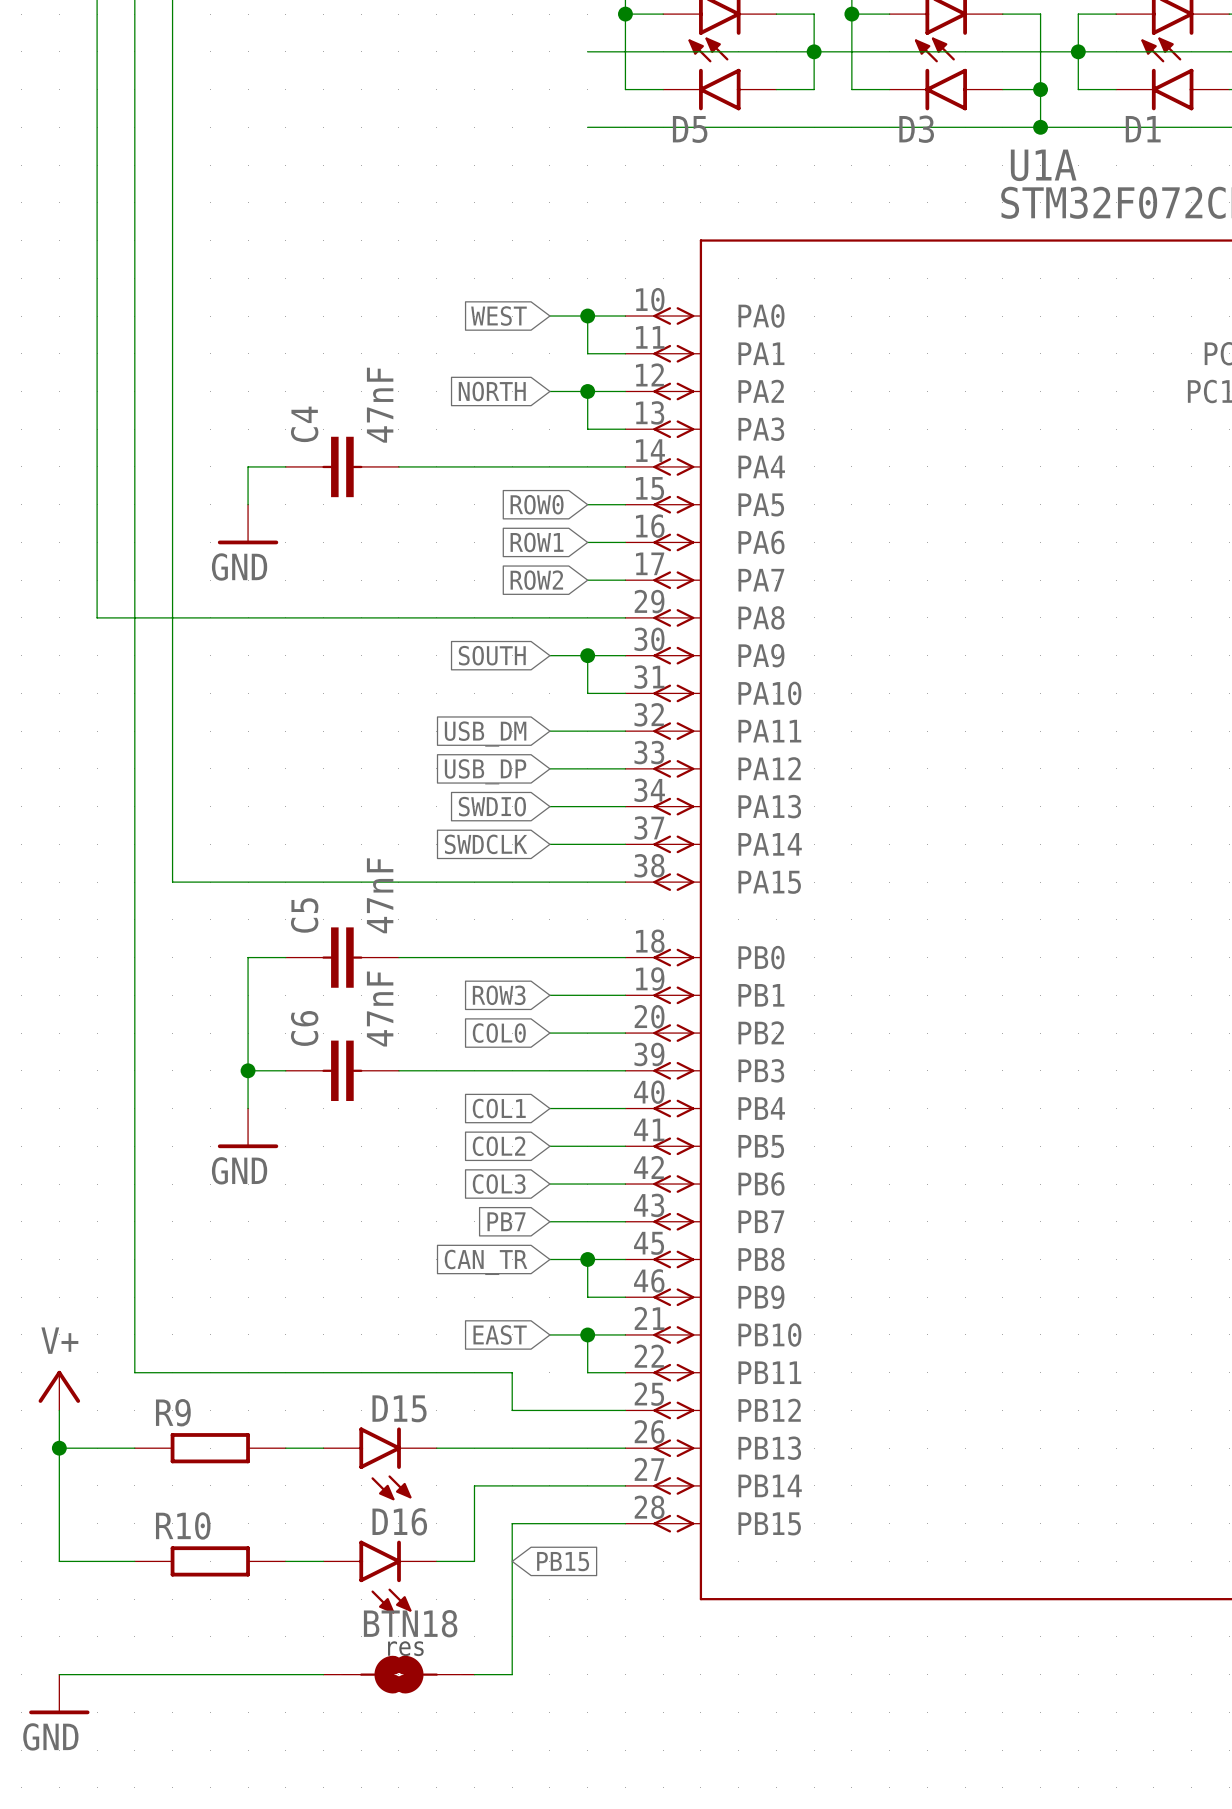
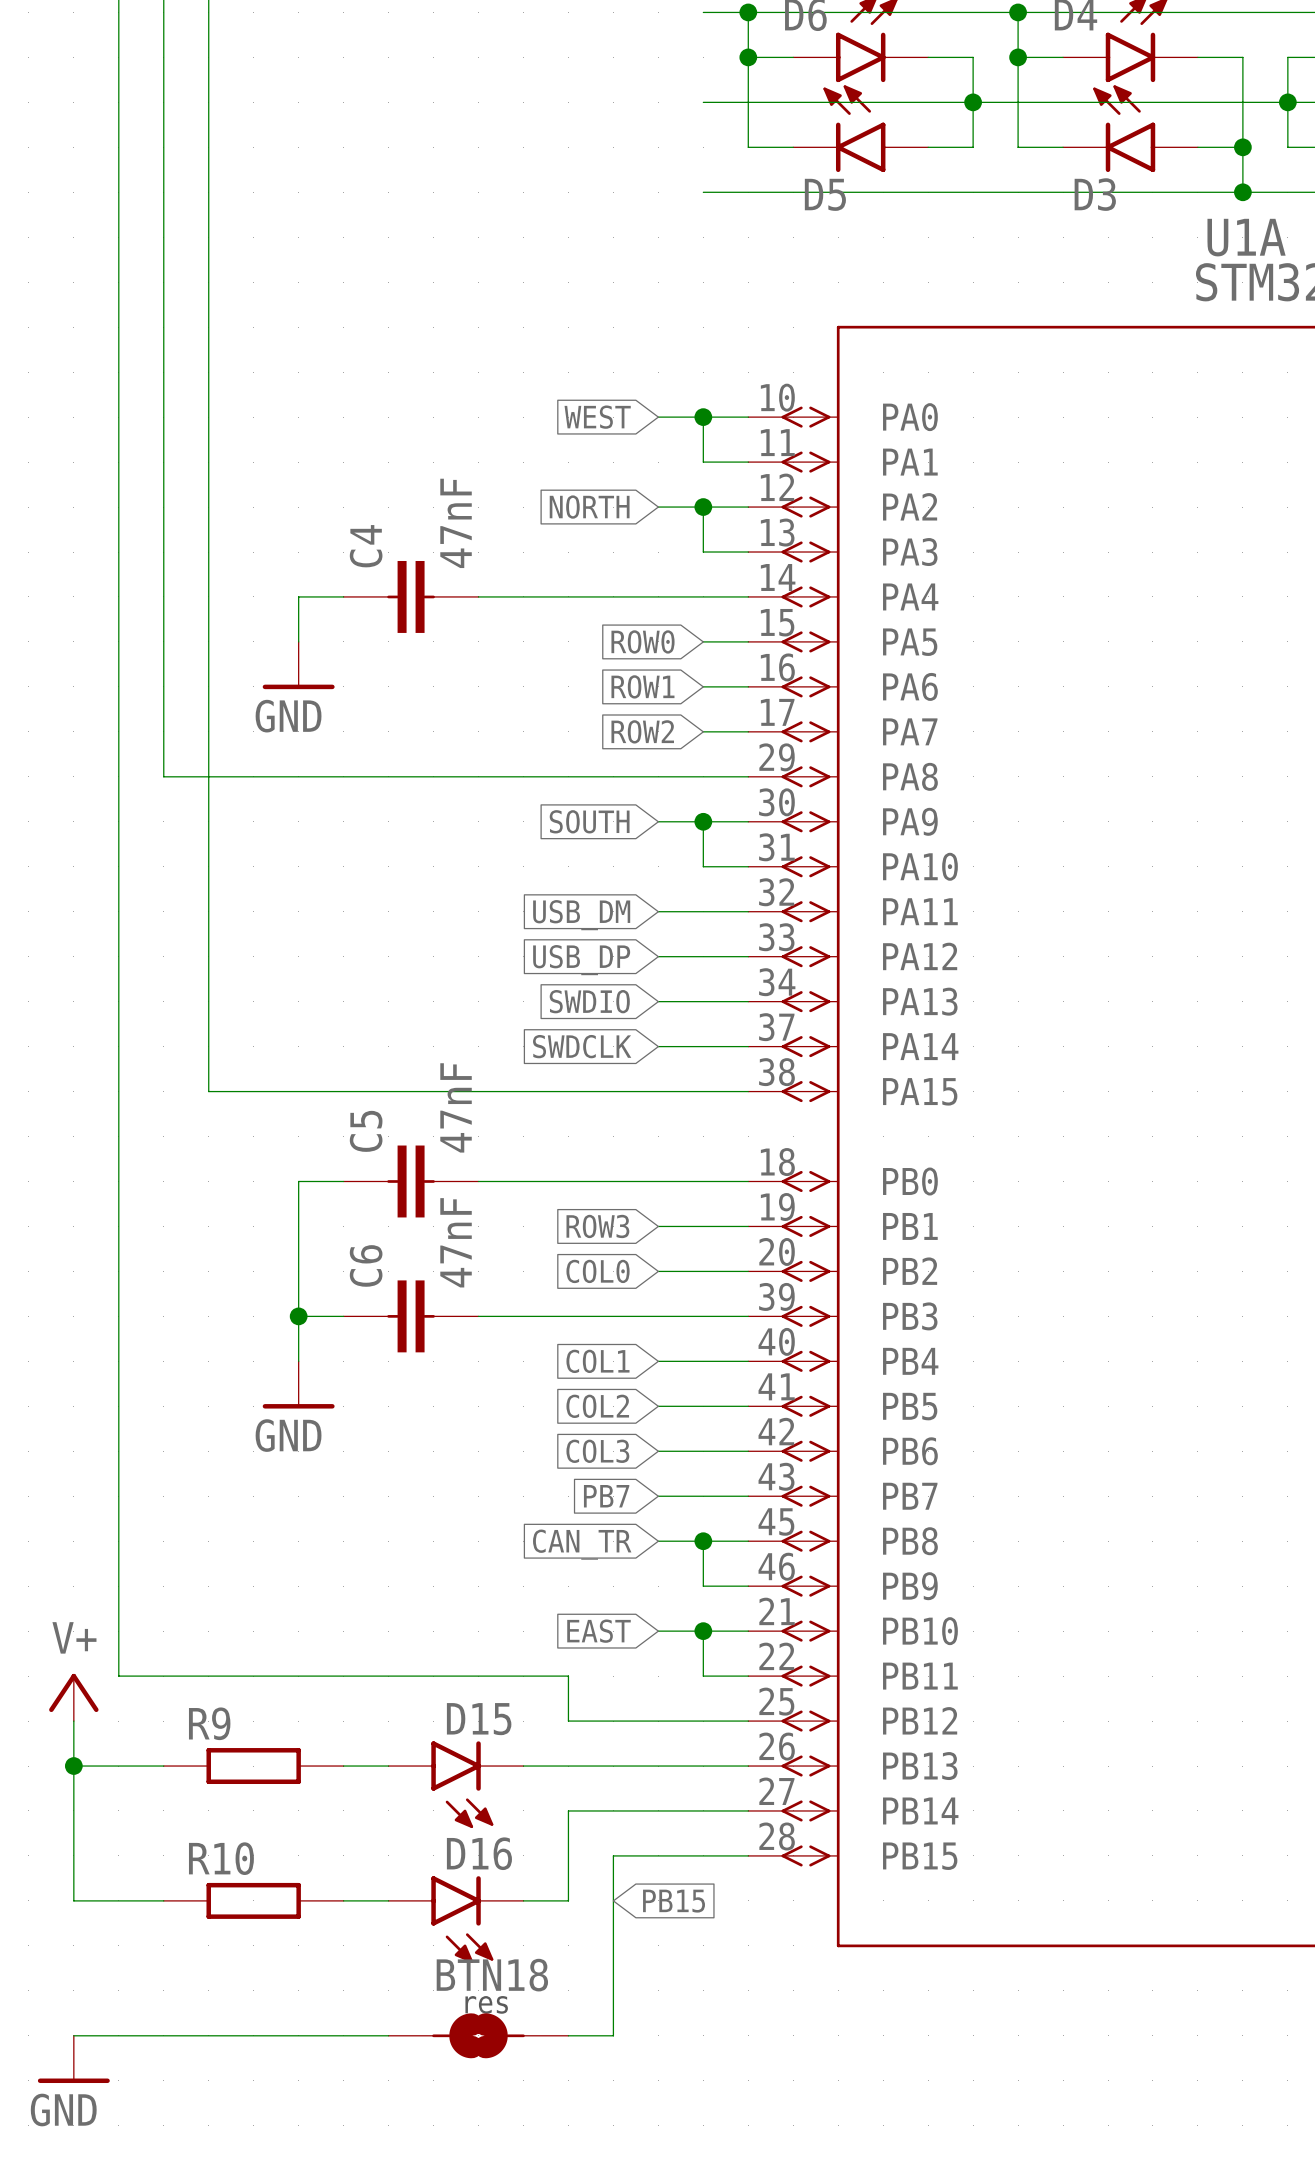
wire: (97, 617) (134, 617) (134, 1372) -> (118, 776) (118, 1676) (163, 1676)
wire: (474, 1372) (512, 1372) (512, 1410) -> (568, 1676) (568, 1721) (613, 1721)

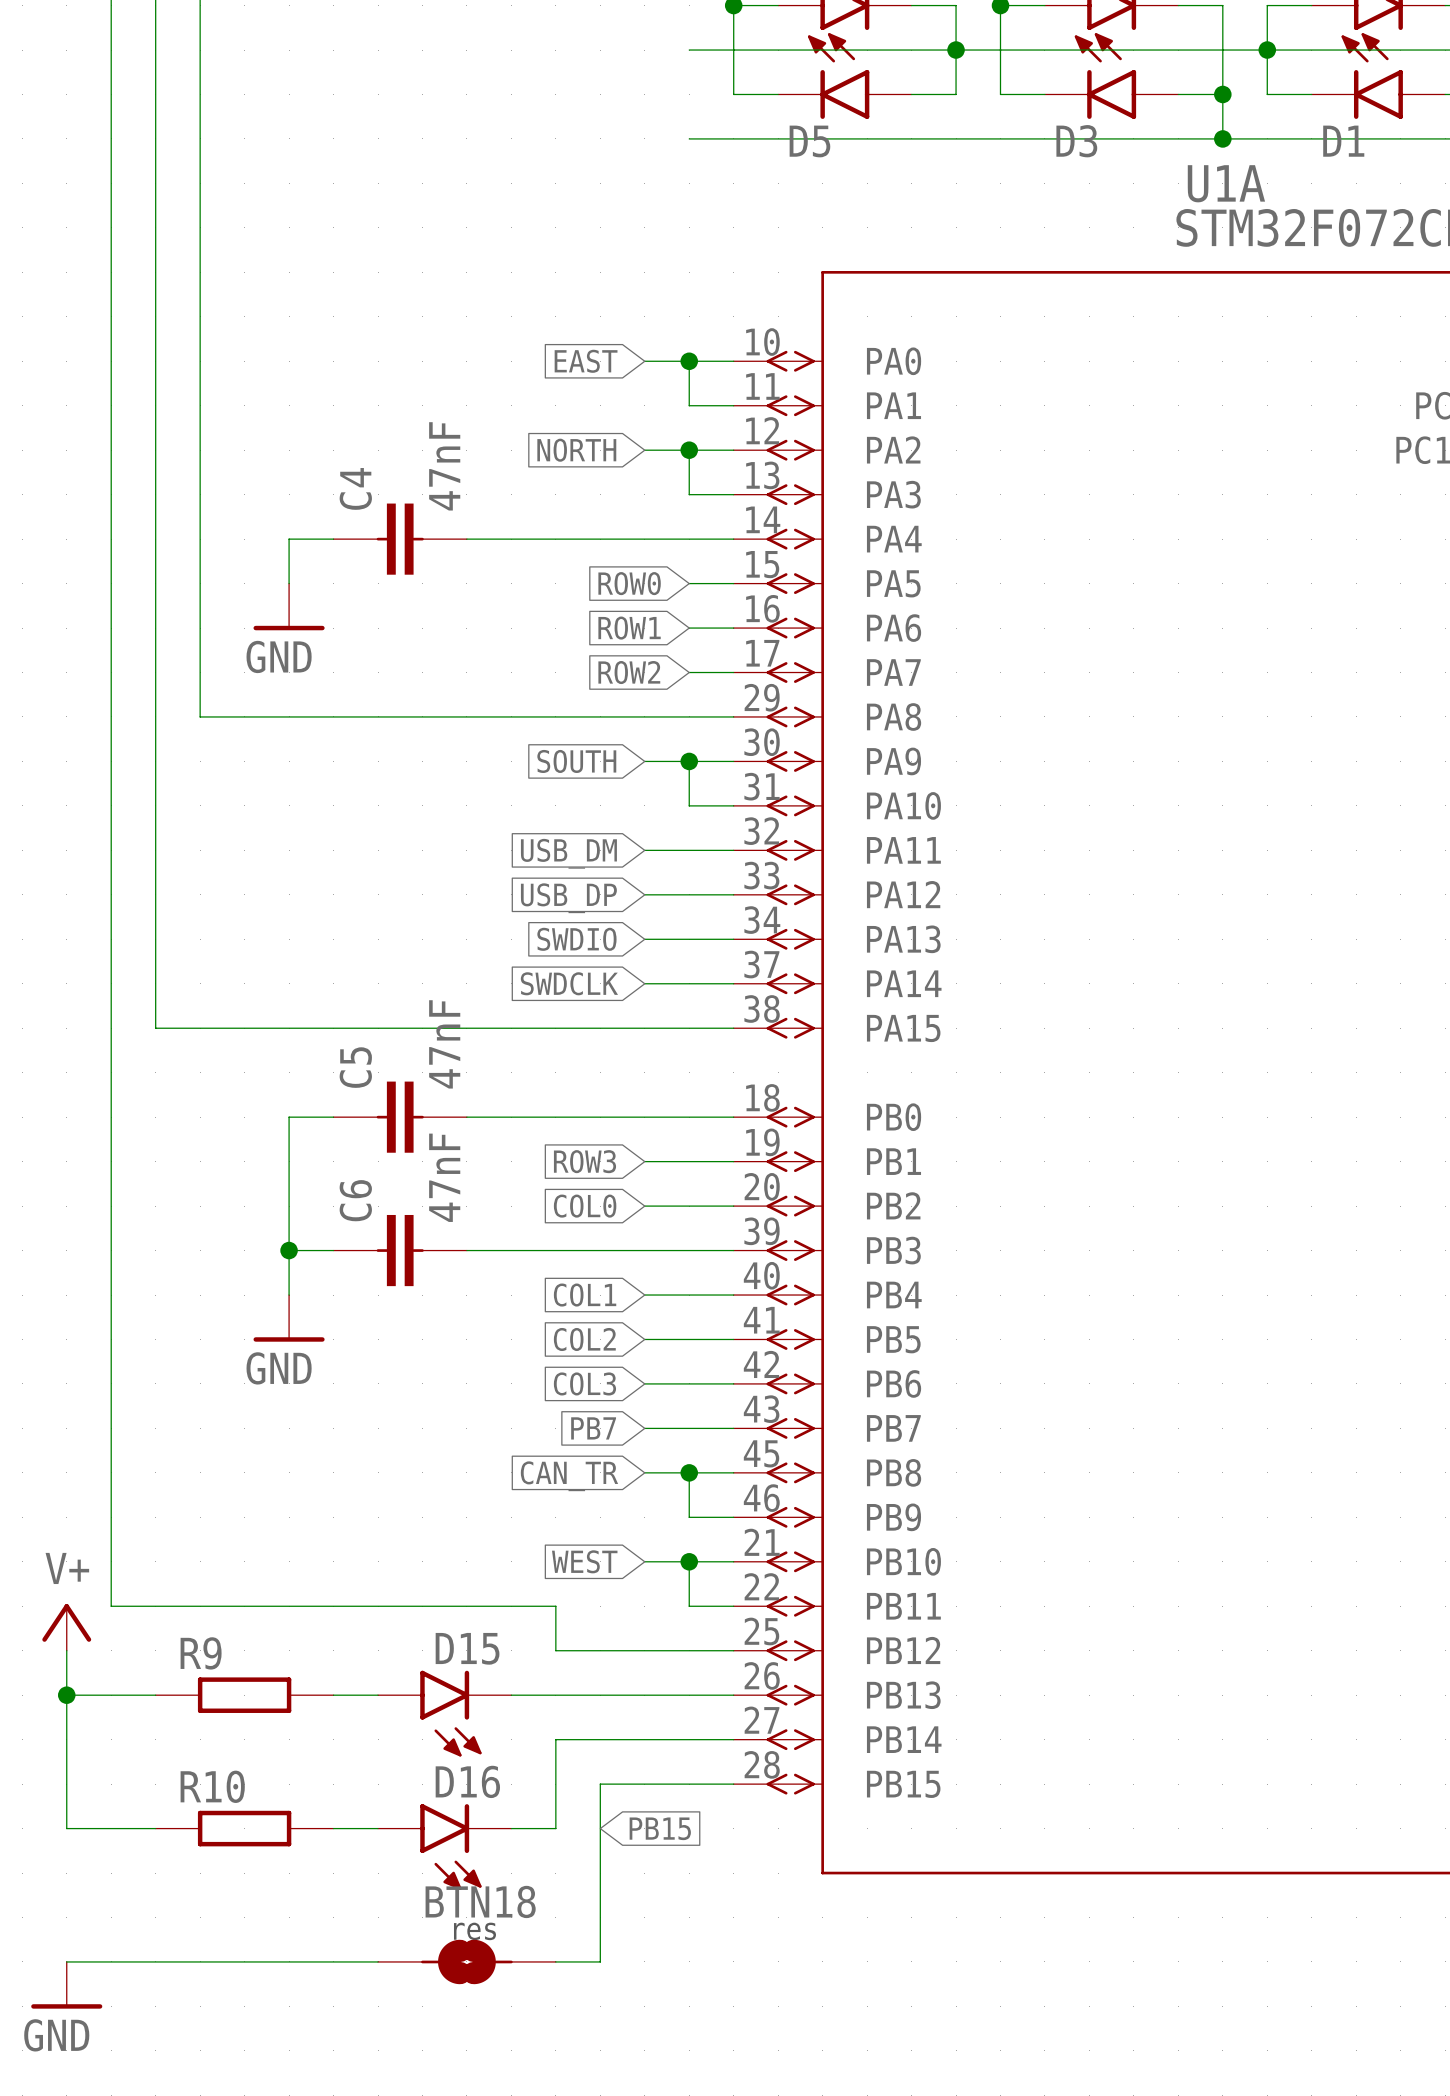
global label: WEST (597, 417) -> EAST (586, 361)
wire: (163, 776) (208, 776) (208, 1091) -> (155, 716) (155, 1028) (200, 1028)
global label: EAST (598, 1631) -> WEST (584, 1561)

